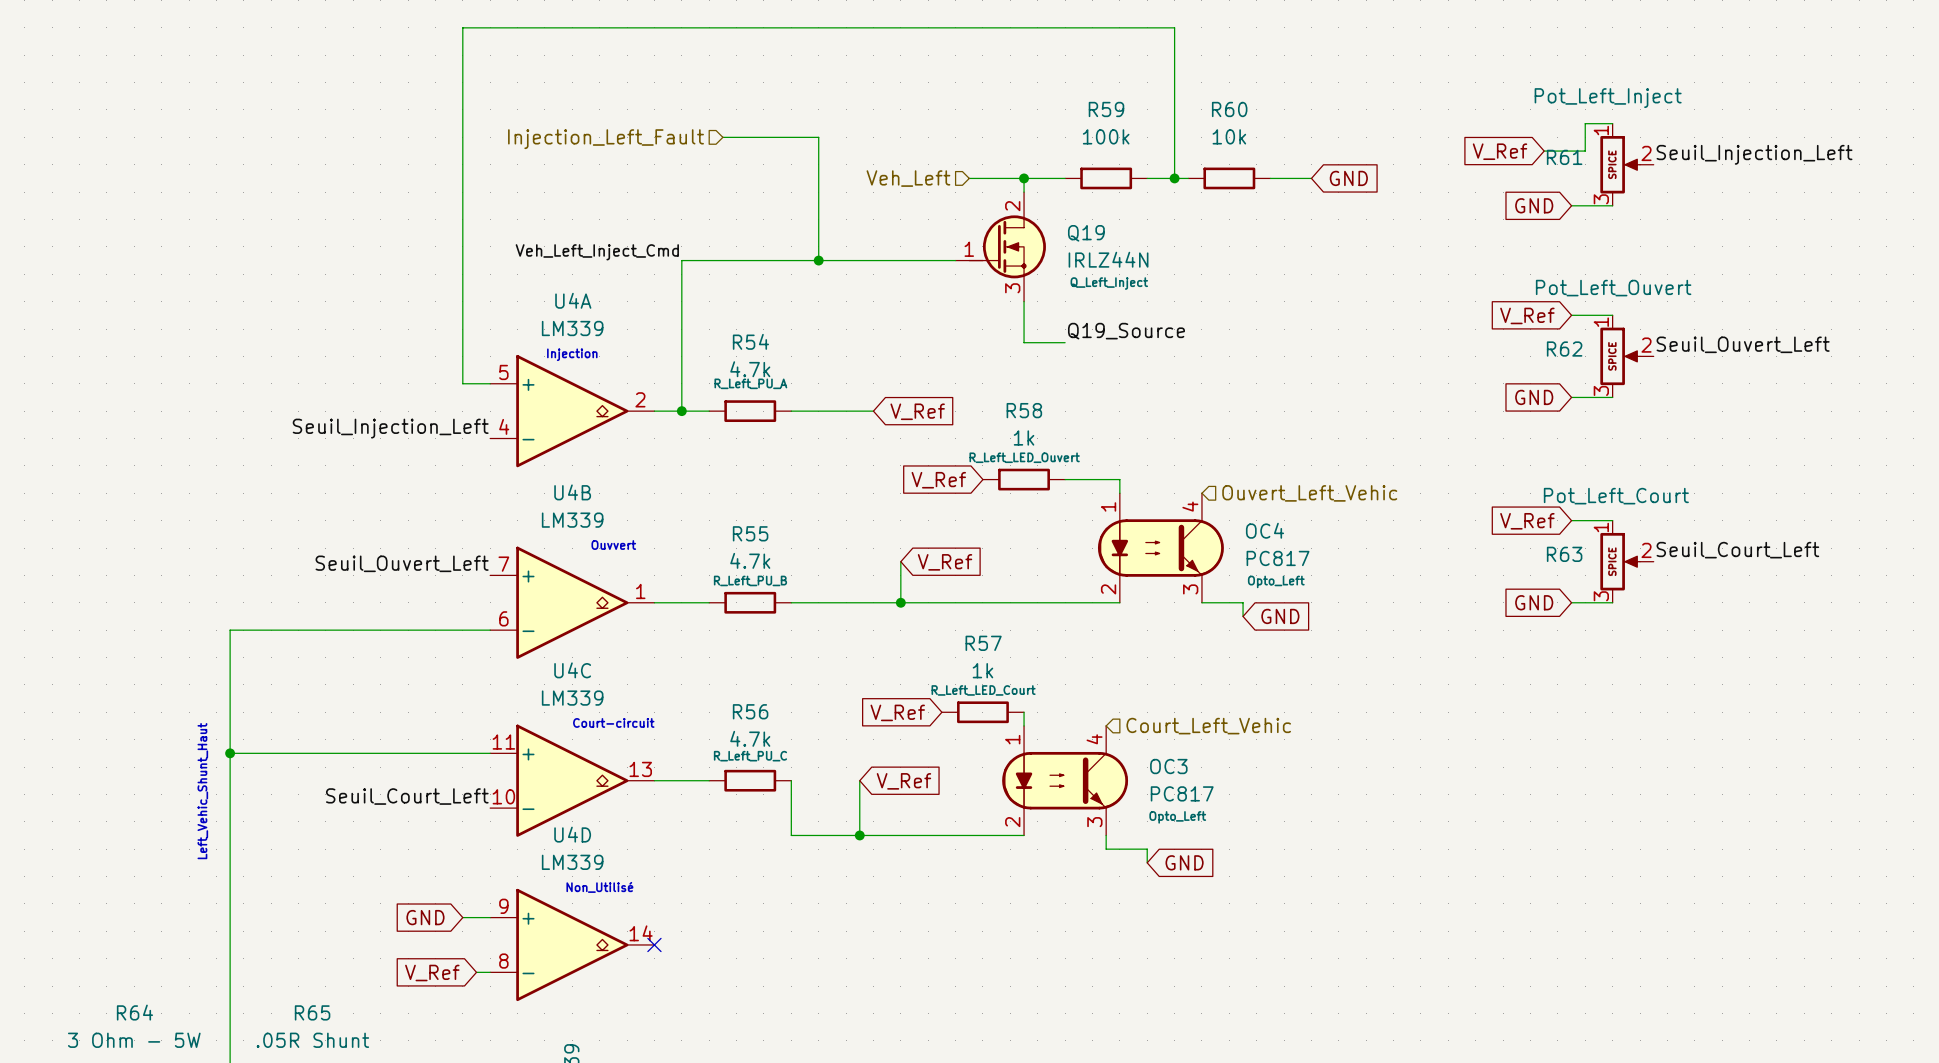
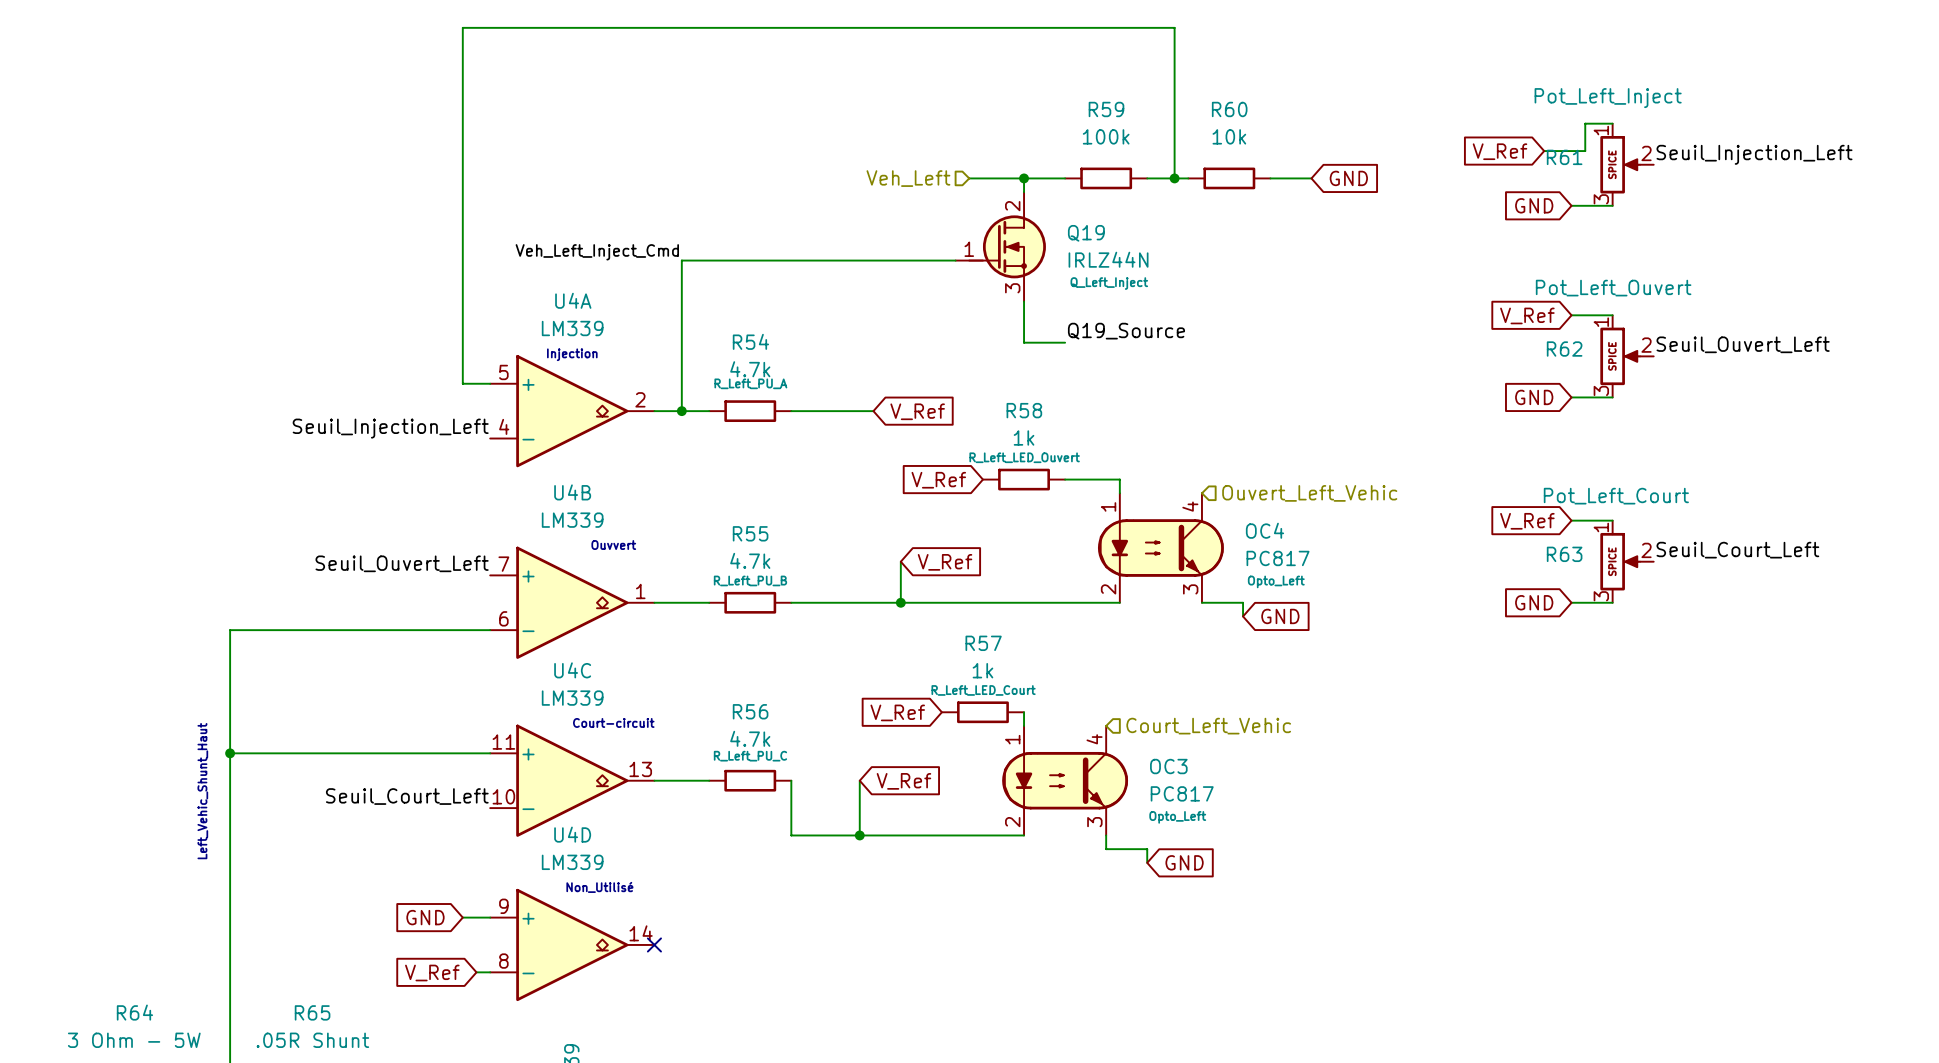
wire: (722, 137) (818, 137) (818, 260) -> none
hierarchical label: Injection_Left_Fault (606, 139) -> none
junction: (818, 260) -> none

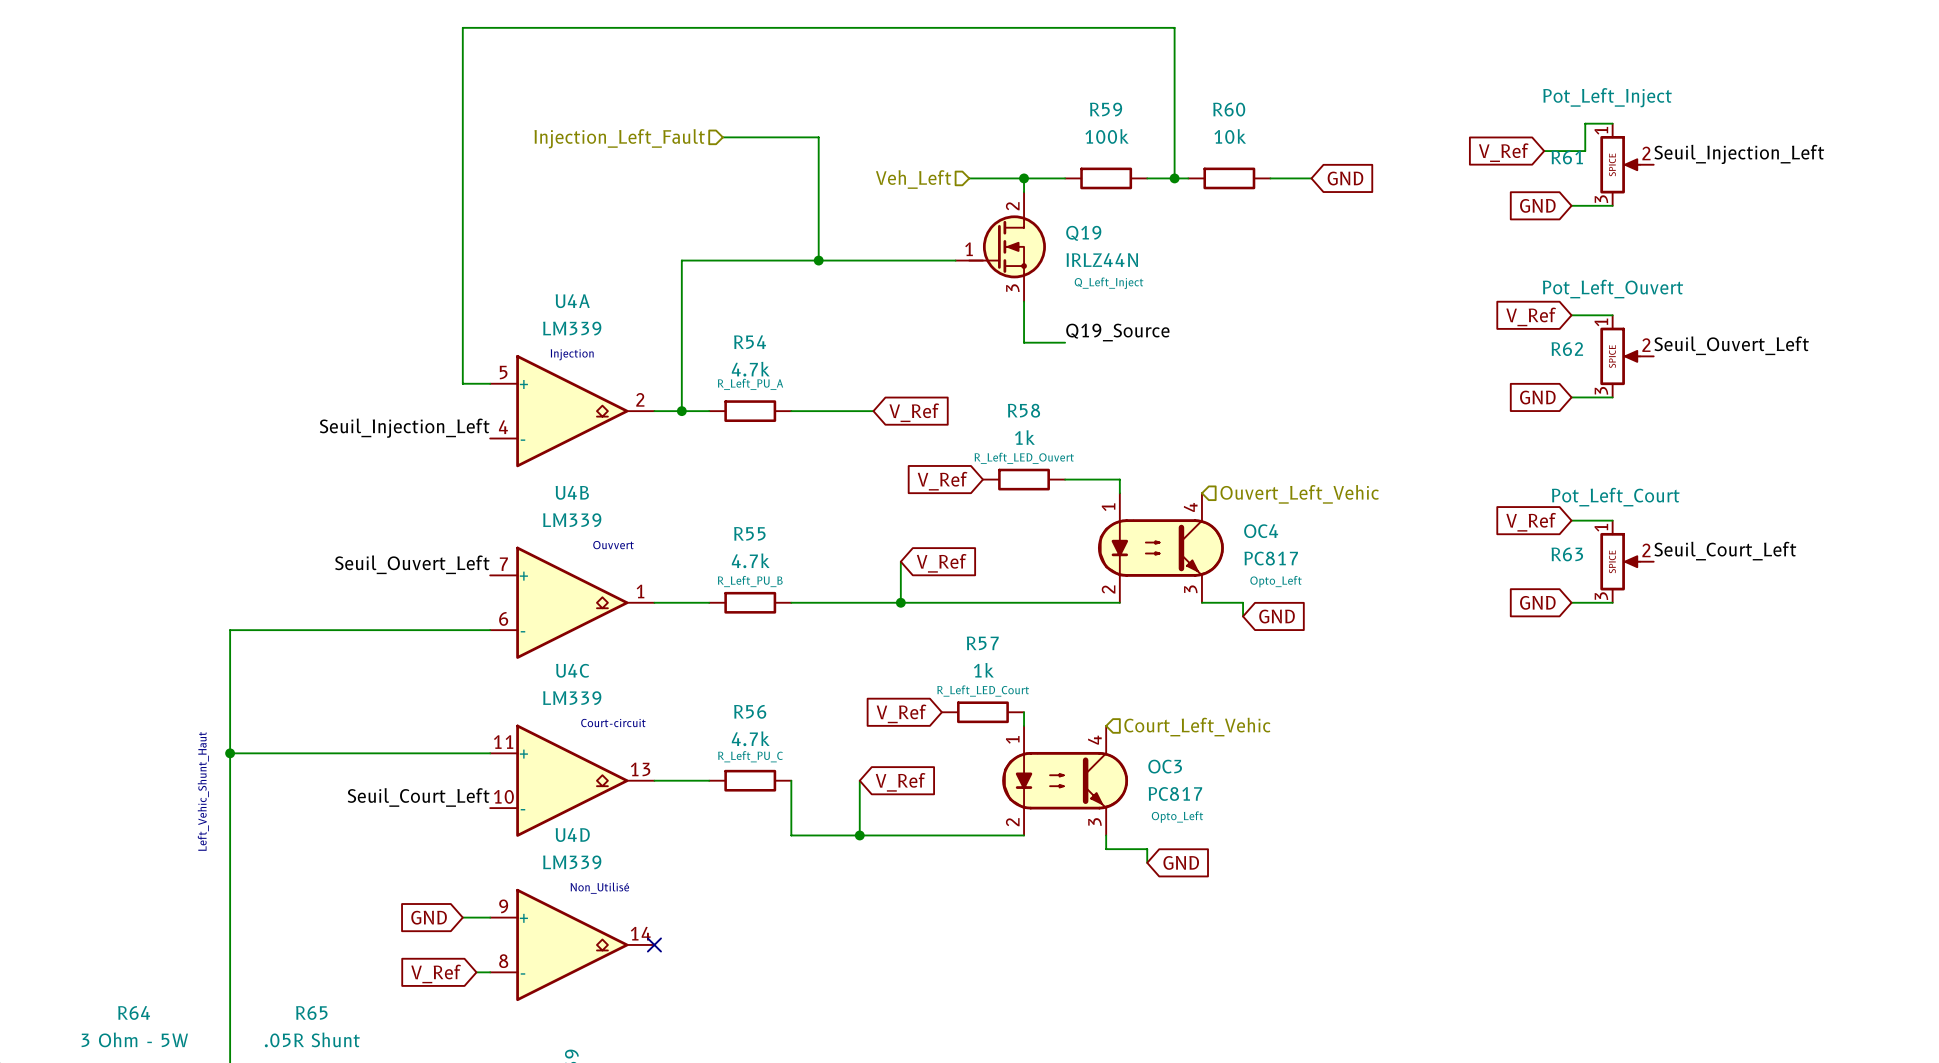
wire: none -> (722, 137) (818, 137) (818, 260)
hierarchical label: none -> Injection_Left_Fault (619, 138)
label: Veh_Left_Inject_Cmd (597, 252) -> none
junction: none -> (818, 260)

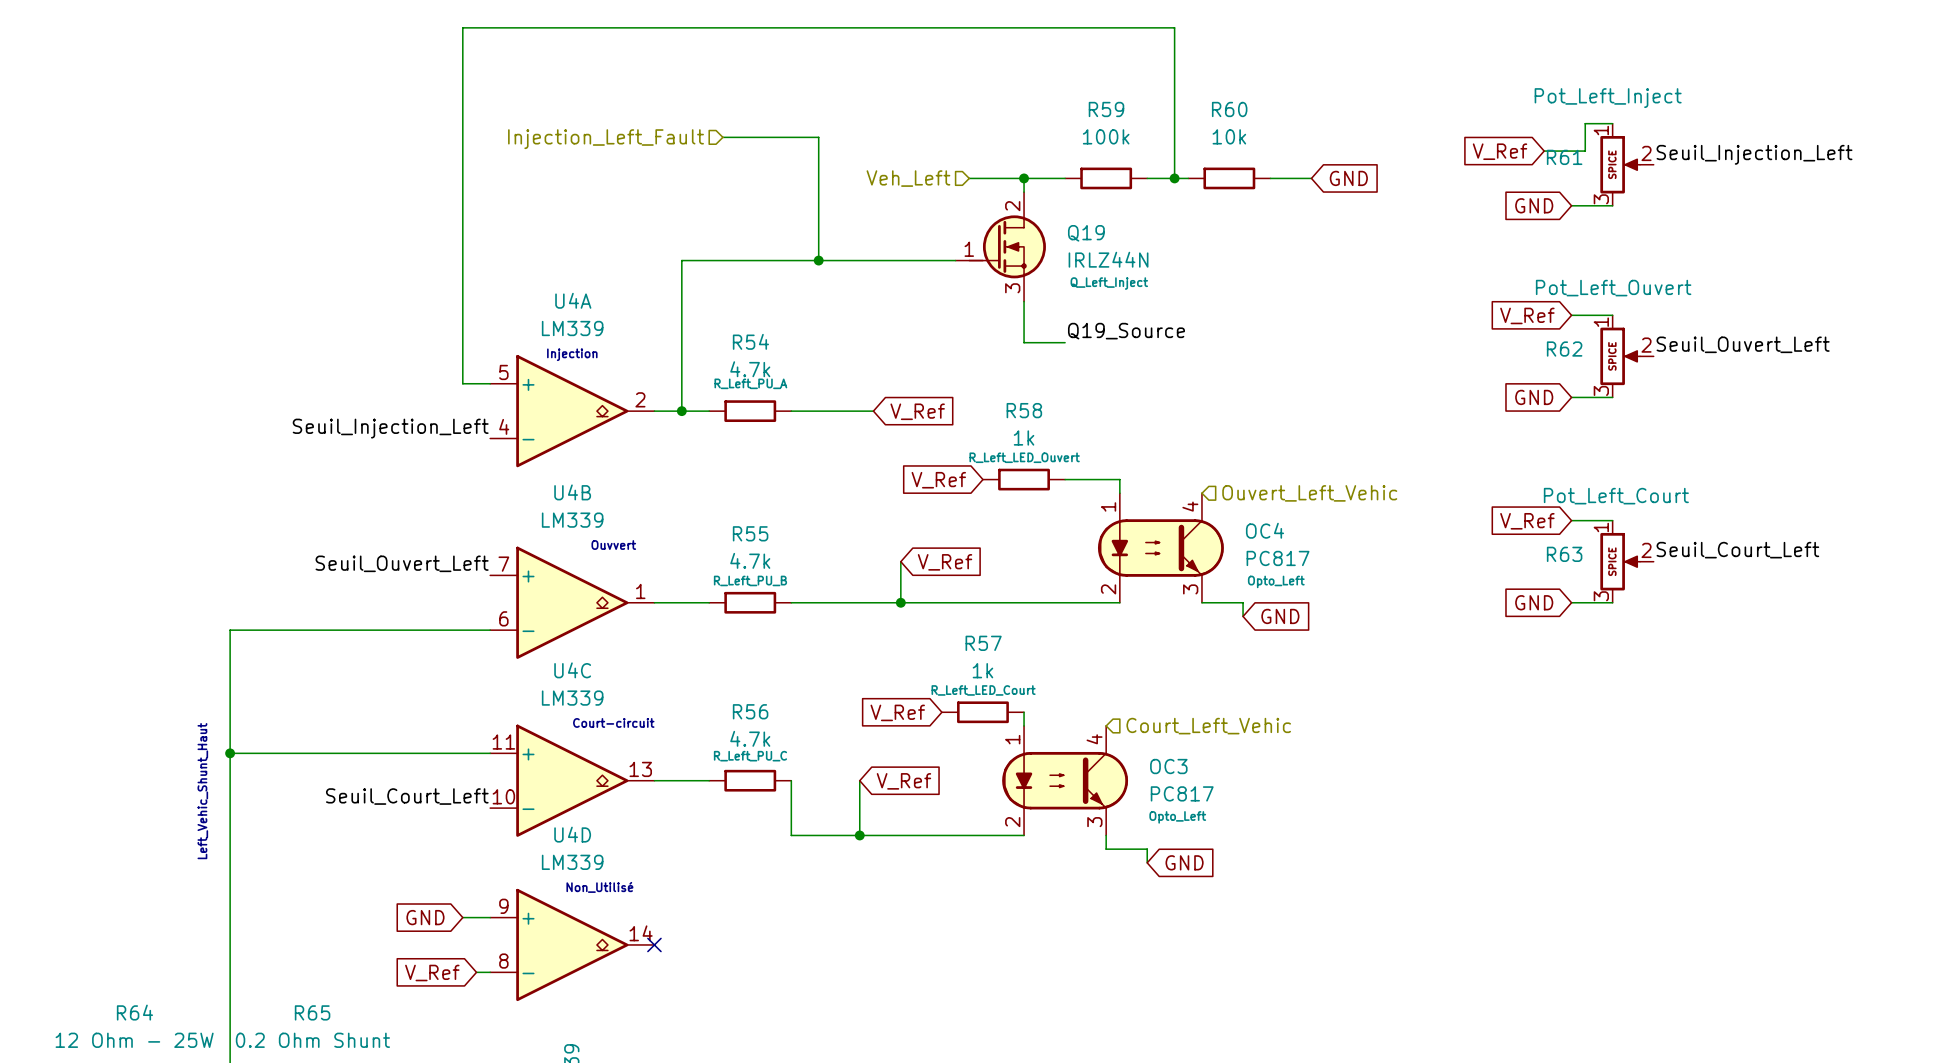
R64 value: 3 Ohm - 5W (134, 1039) -> 12 Ohm - 25W (134, 1040)
R65 value: .05R Shunt (312, 1039) -> 0.2 Ohm Shunt (312, 1040)

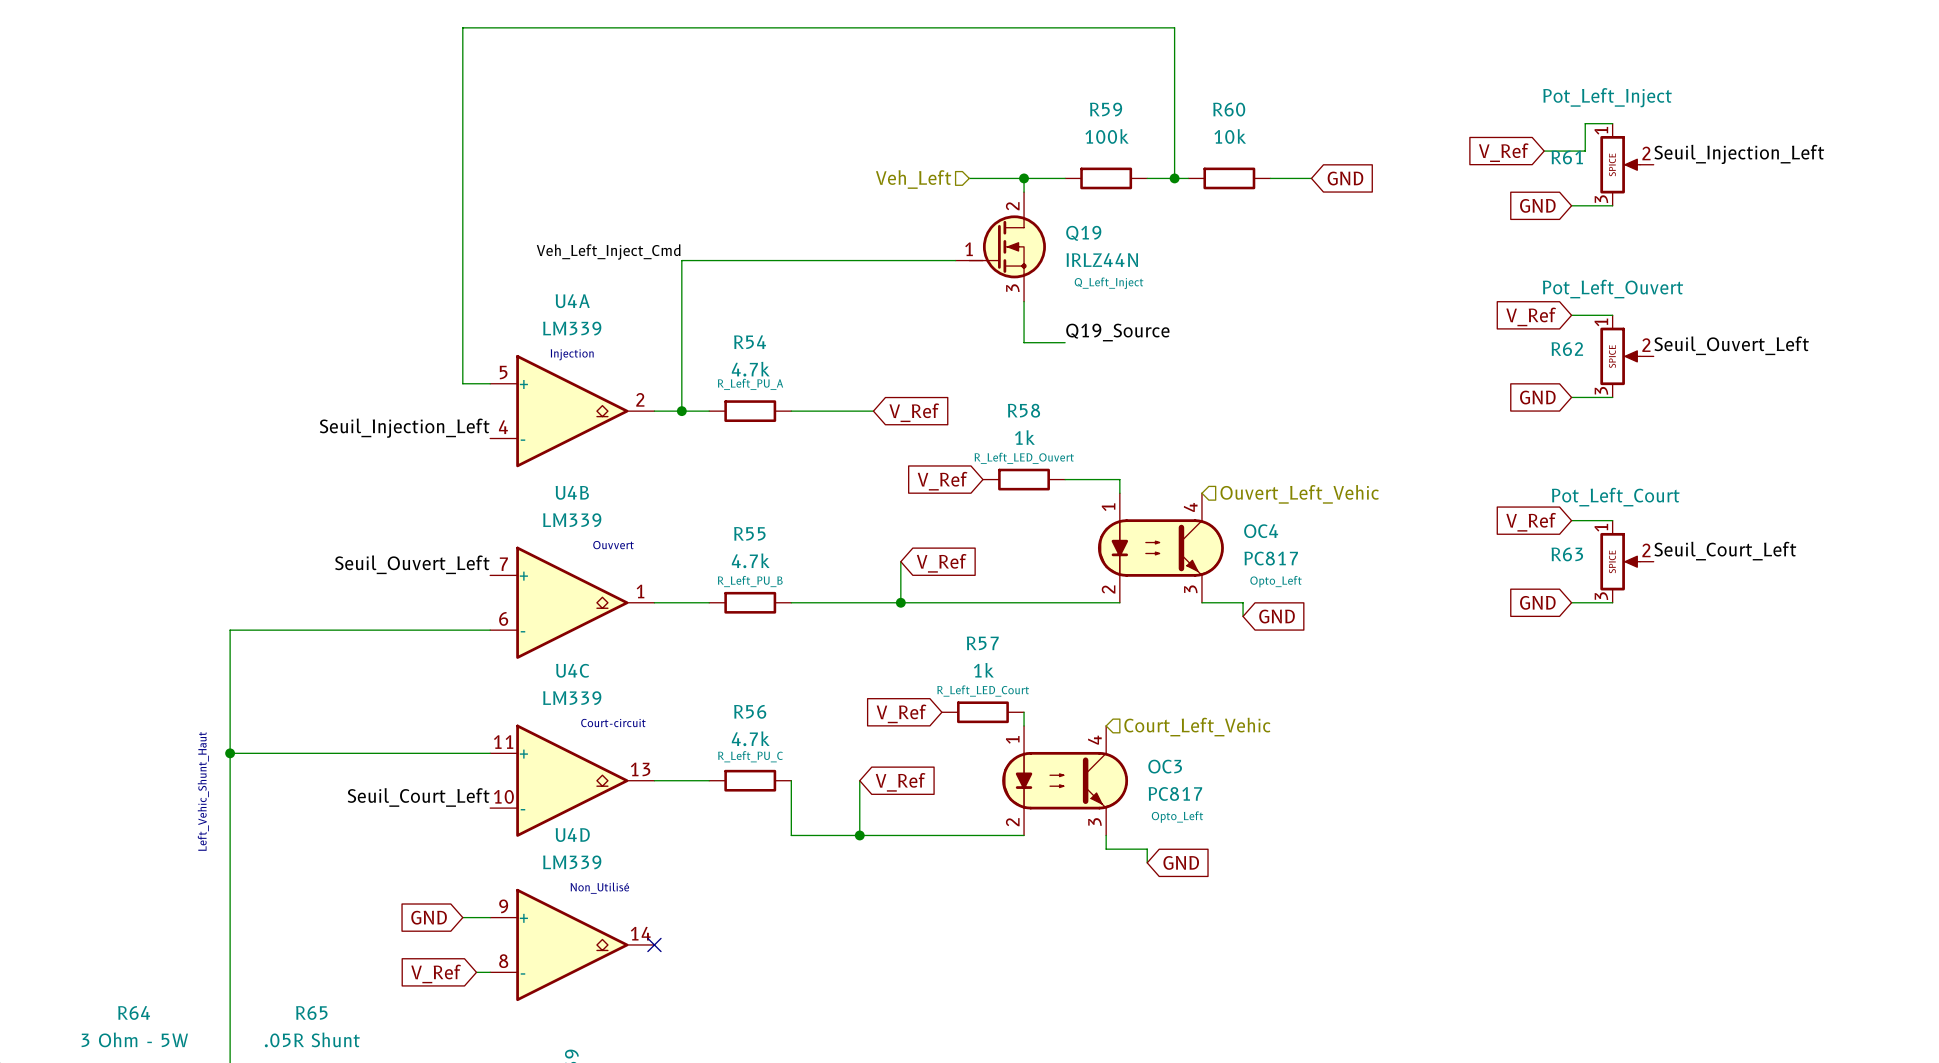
wire: (722, 137) (818, 137) (818, 260) -> none
hierarchical label: Injection_Left_Fault (606, 139) -> none
label: none -> Veh_Left_Inject_Cmd (608, 251)
junction: (818, 260) -> none
R64 value: 12 Ohm - 25W (134, 1040) -> 3 Ohm - 5W (134, 1039)
R65 value: 0.2 Ohm Shunt (312, 1040) -> .05R Shunt (312, 1039)

